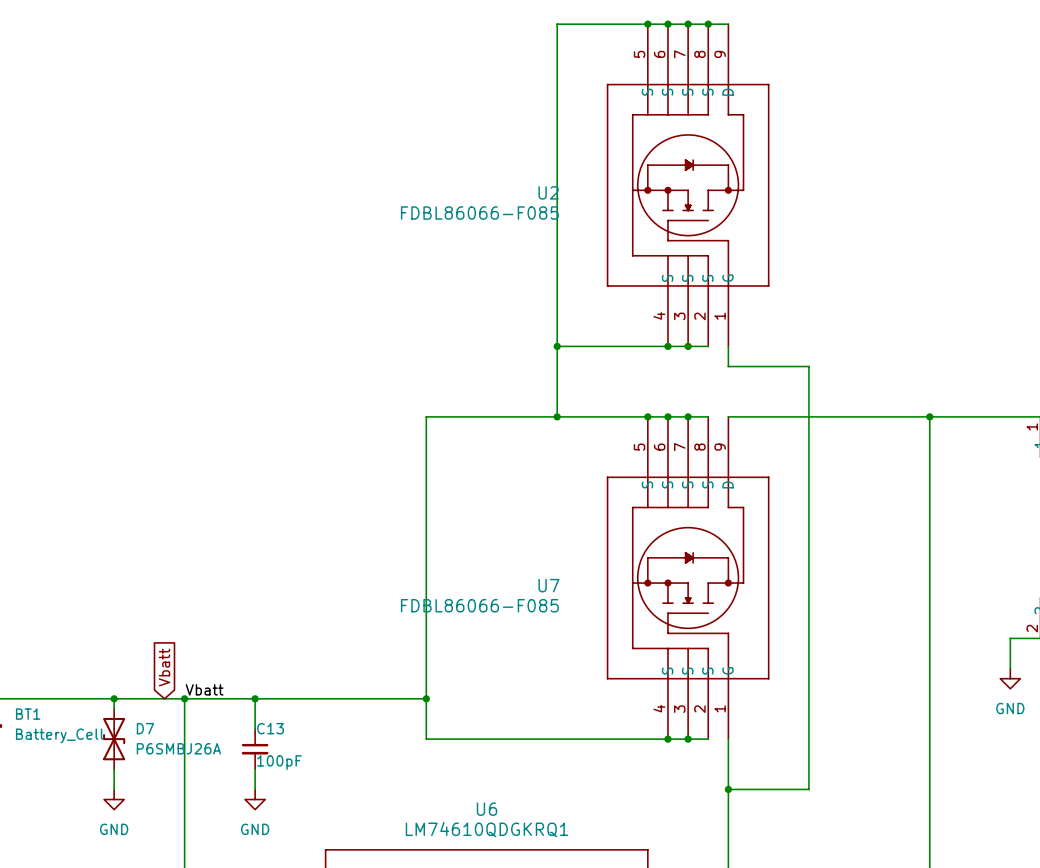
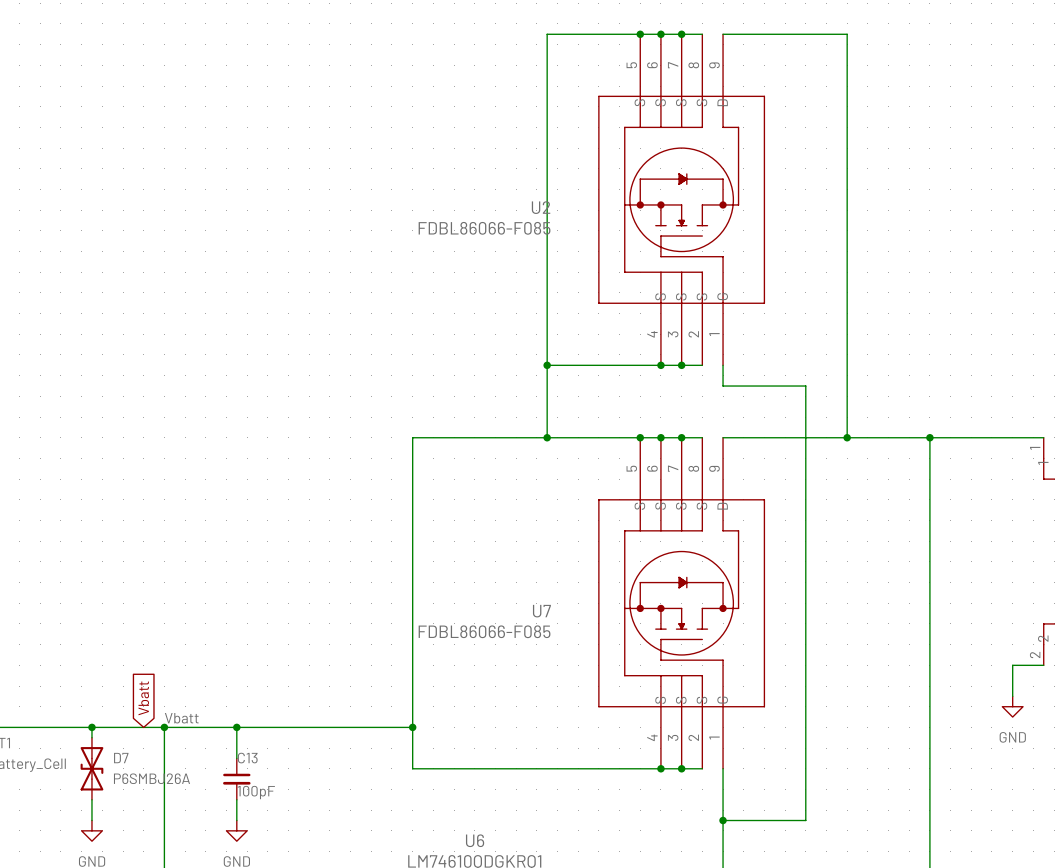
wire: (708, 24) (728, 24) -> (847, 437) (847, 34) (723, 34)
junction: (708, 24) -> none
junction: none -> (847, 437)

